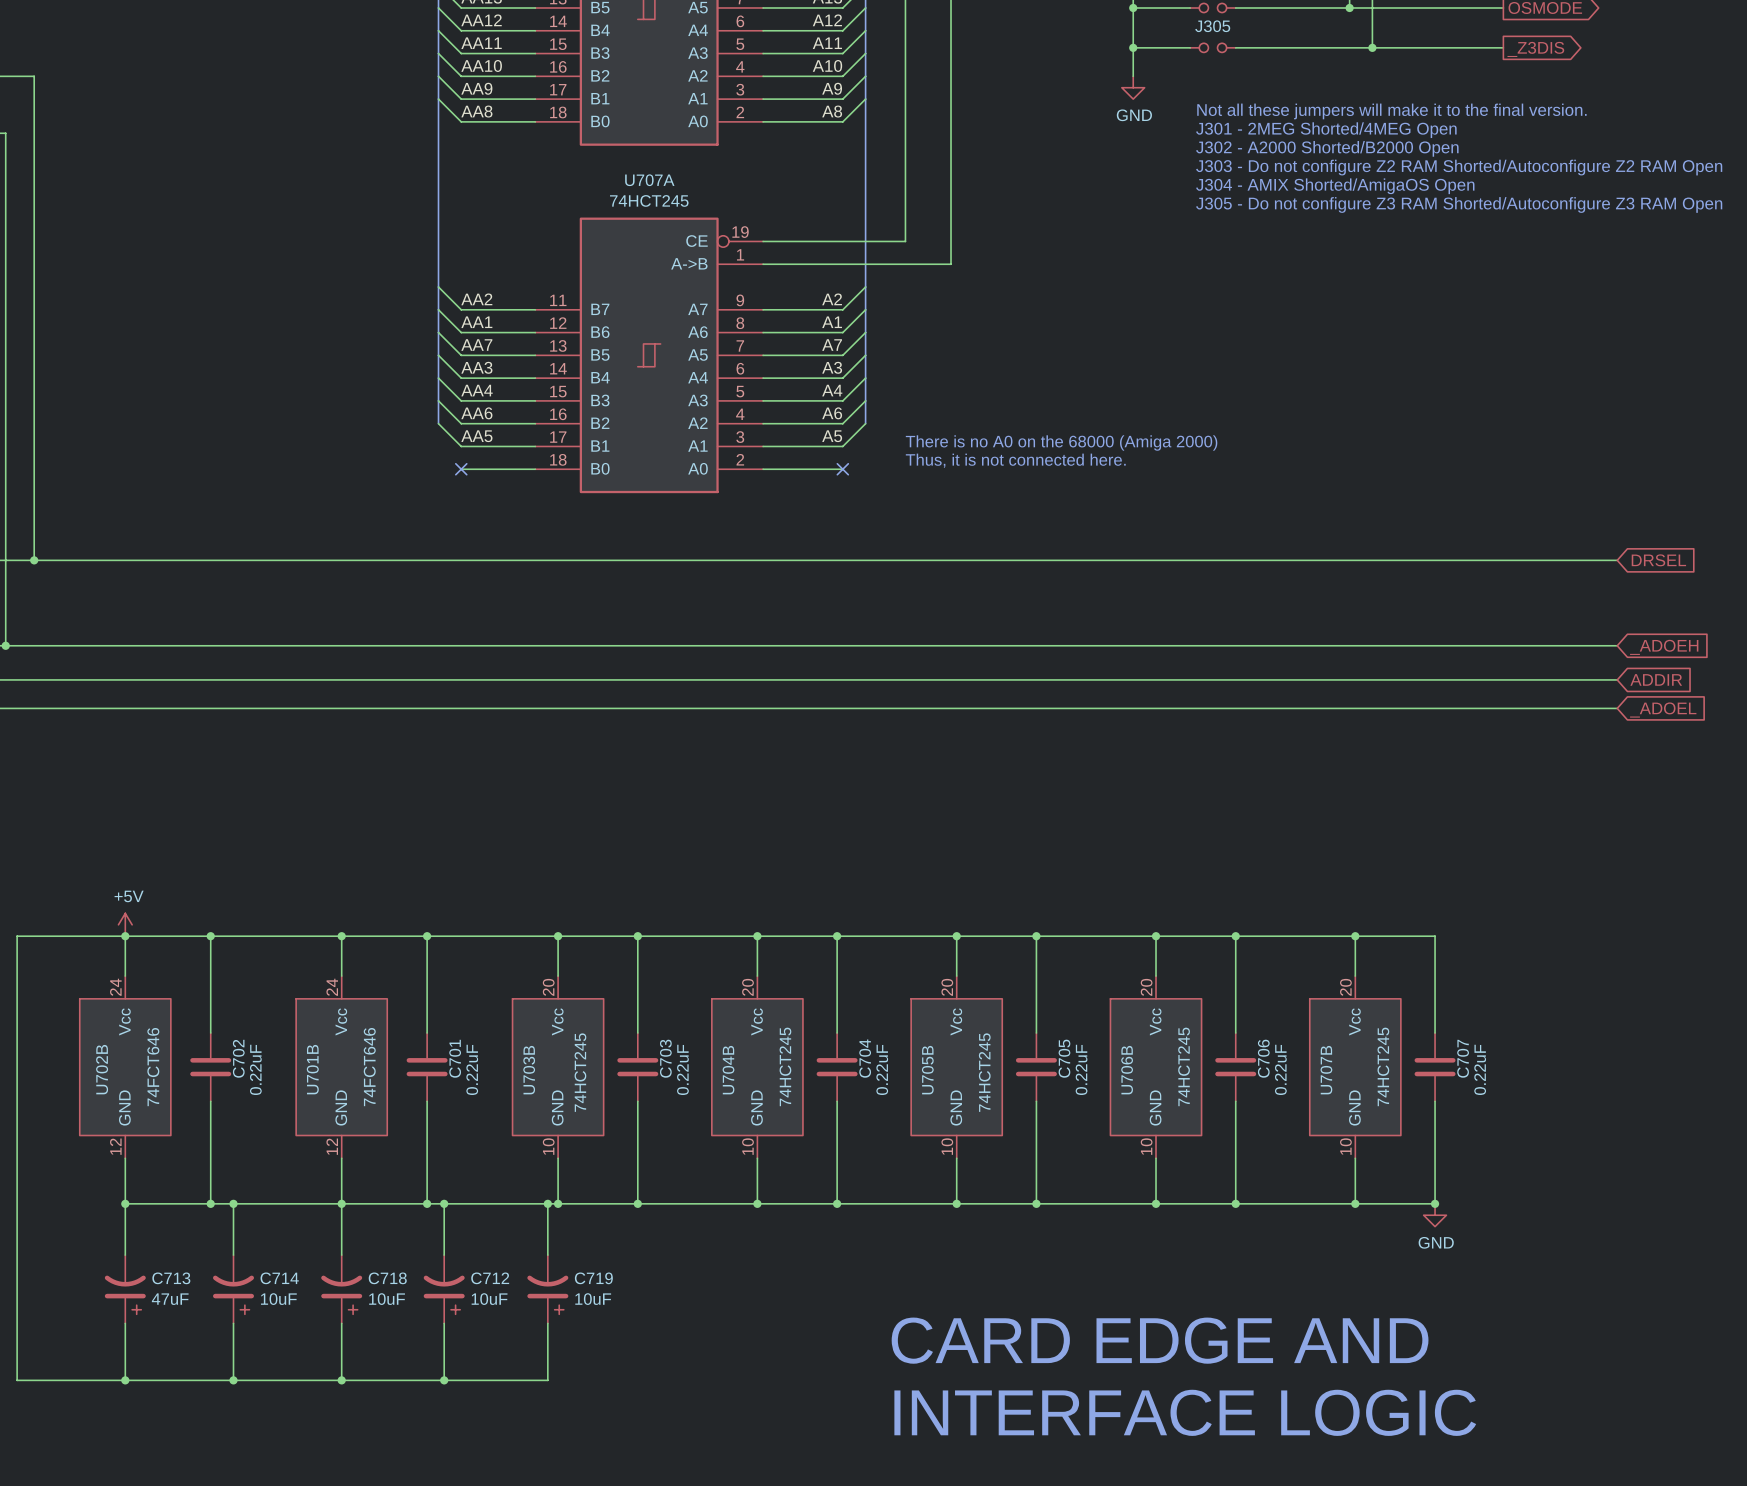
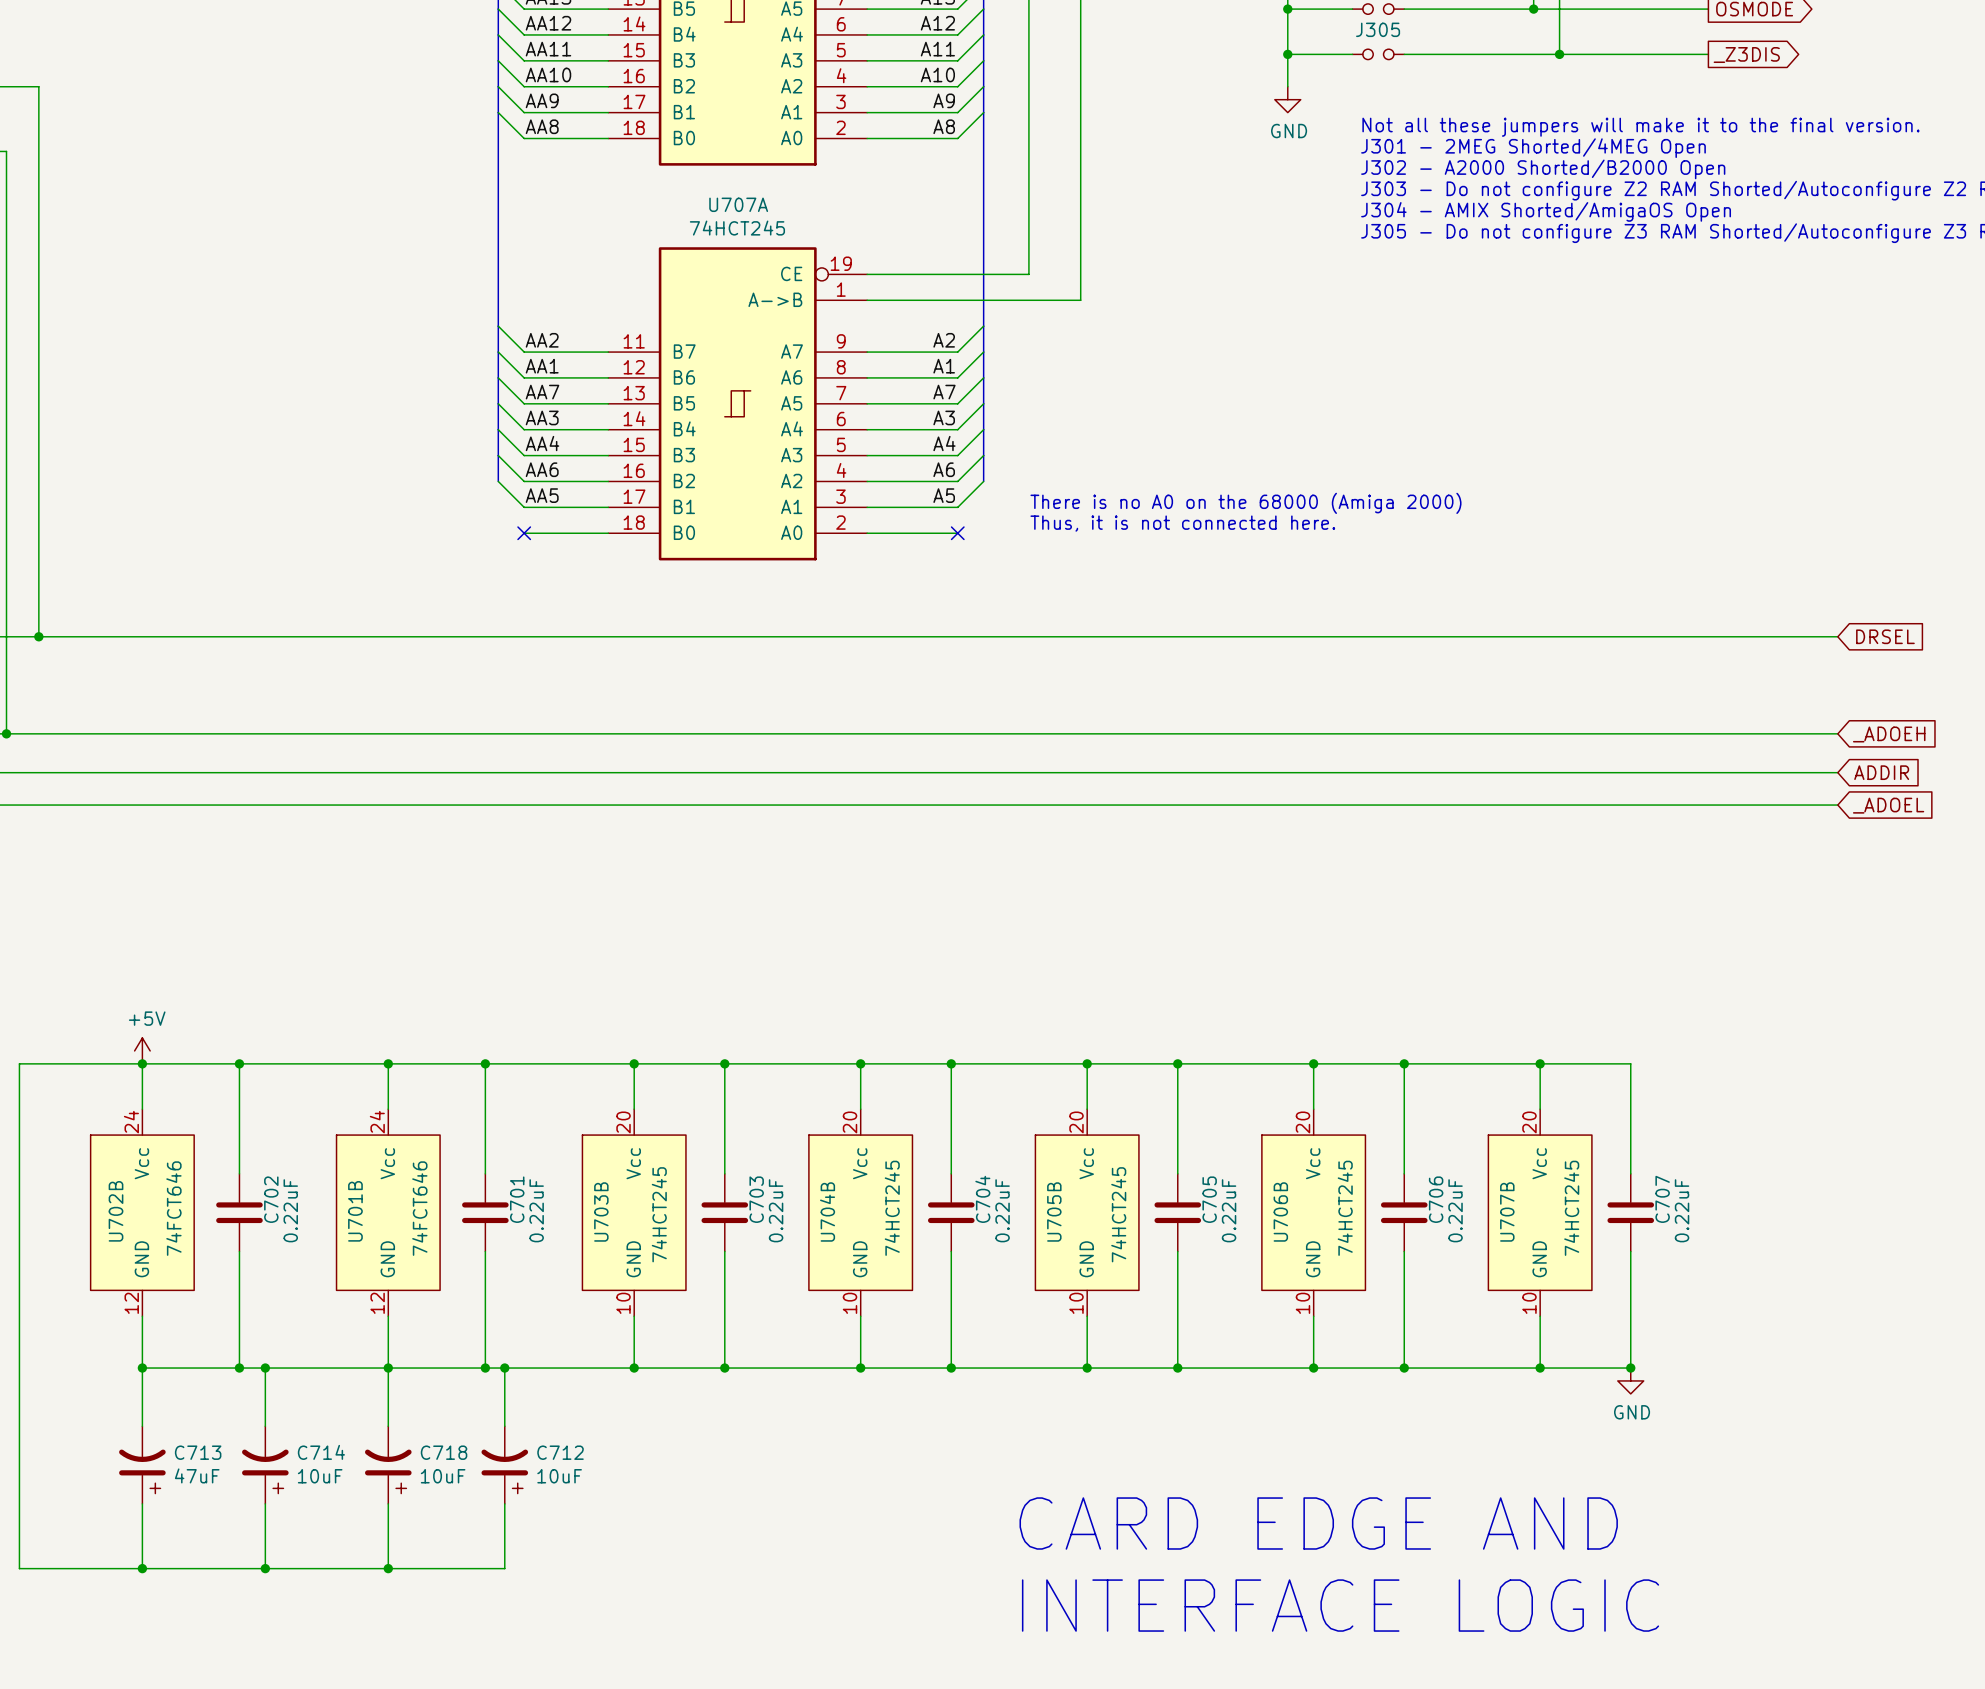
wire: (547, 1203) (547, 1255) -> none
junction: (547, 1203) -> none
C719: 10uF (547, 1289) -> none
wire: (547, 1323) (547, 1380) (444, 1380) -> none
junction: (444, 1380) -> none

